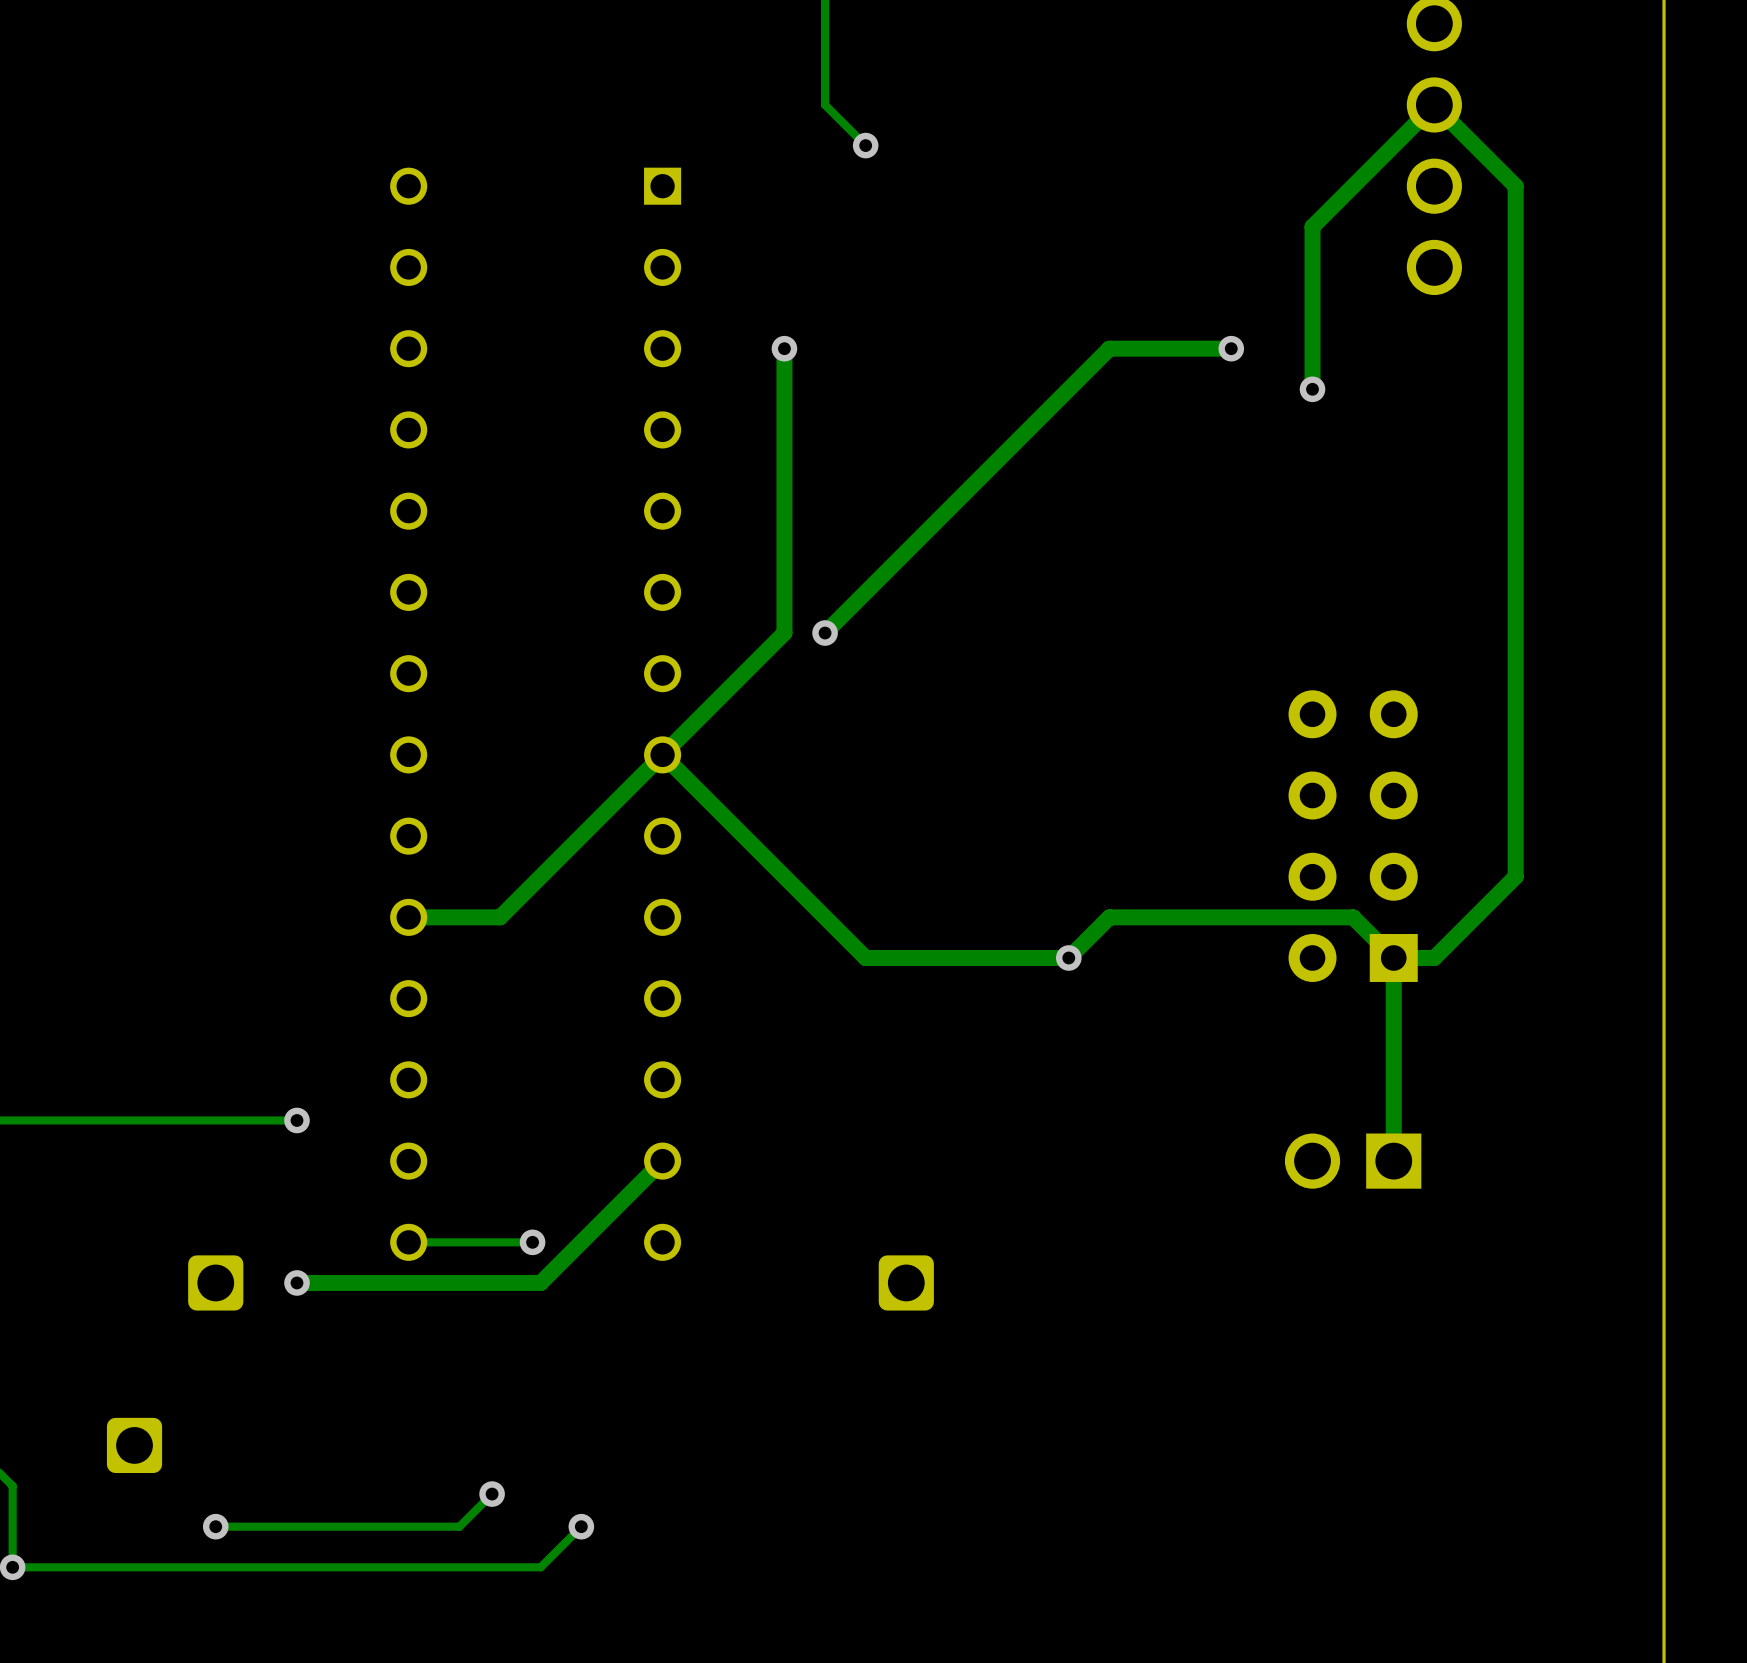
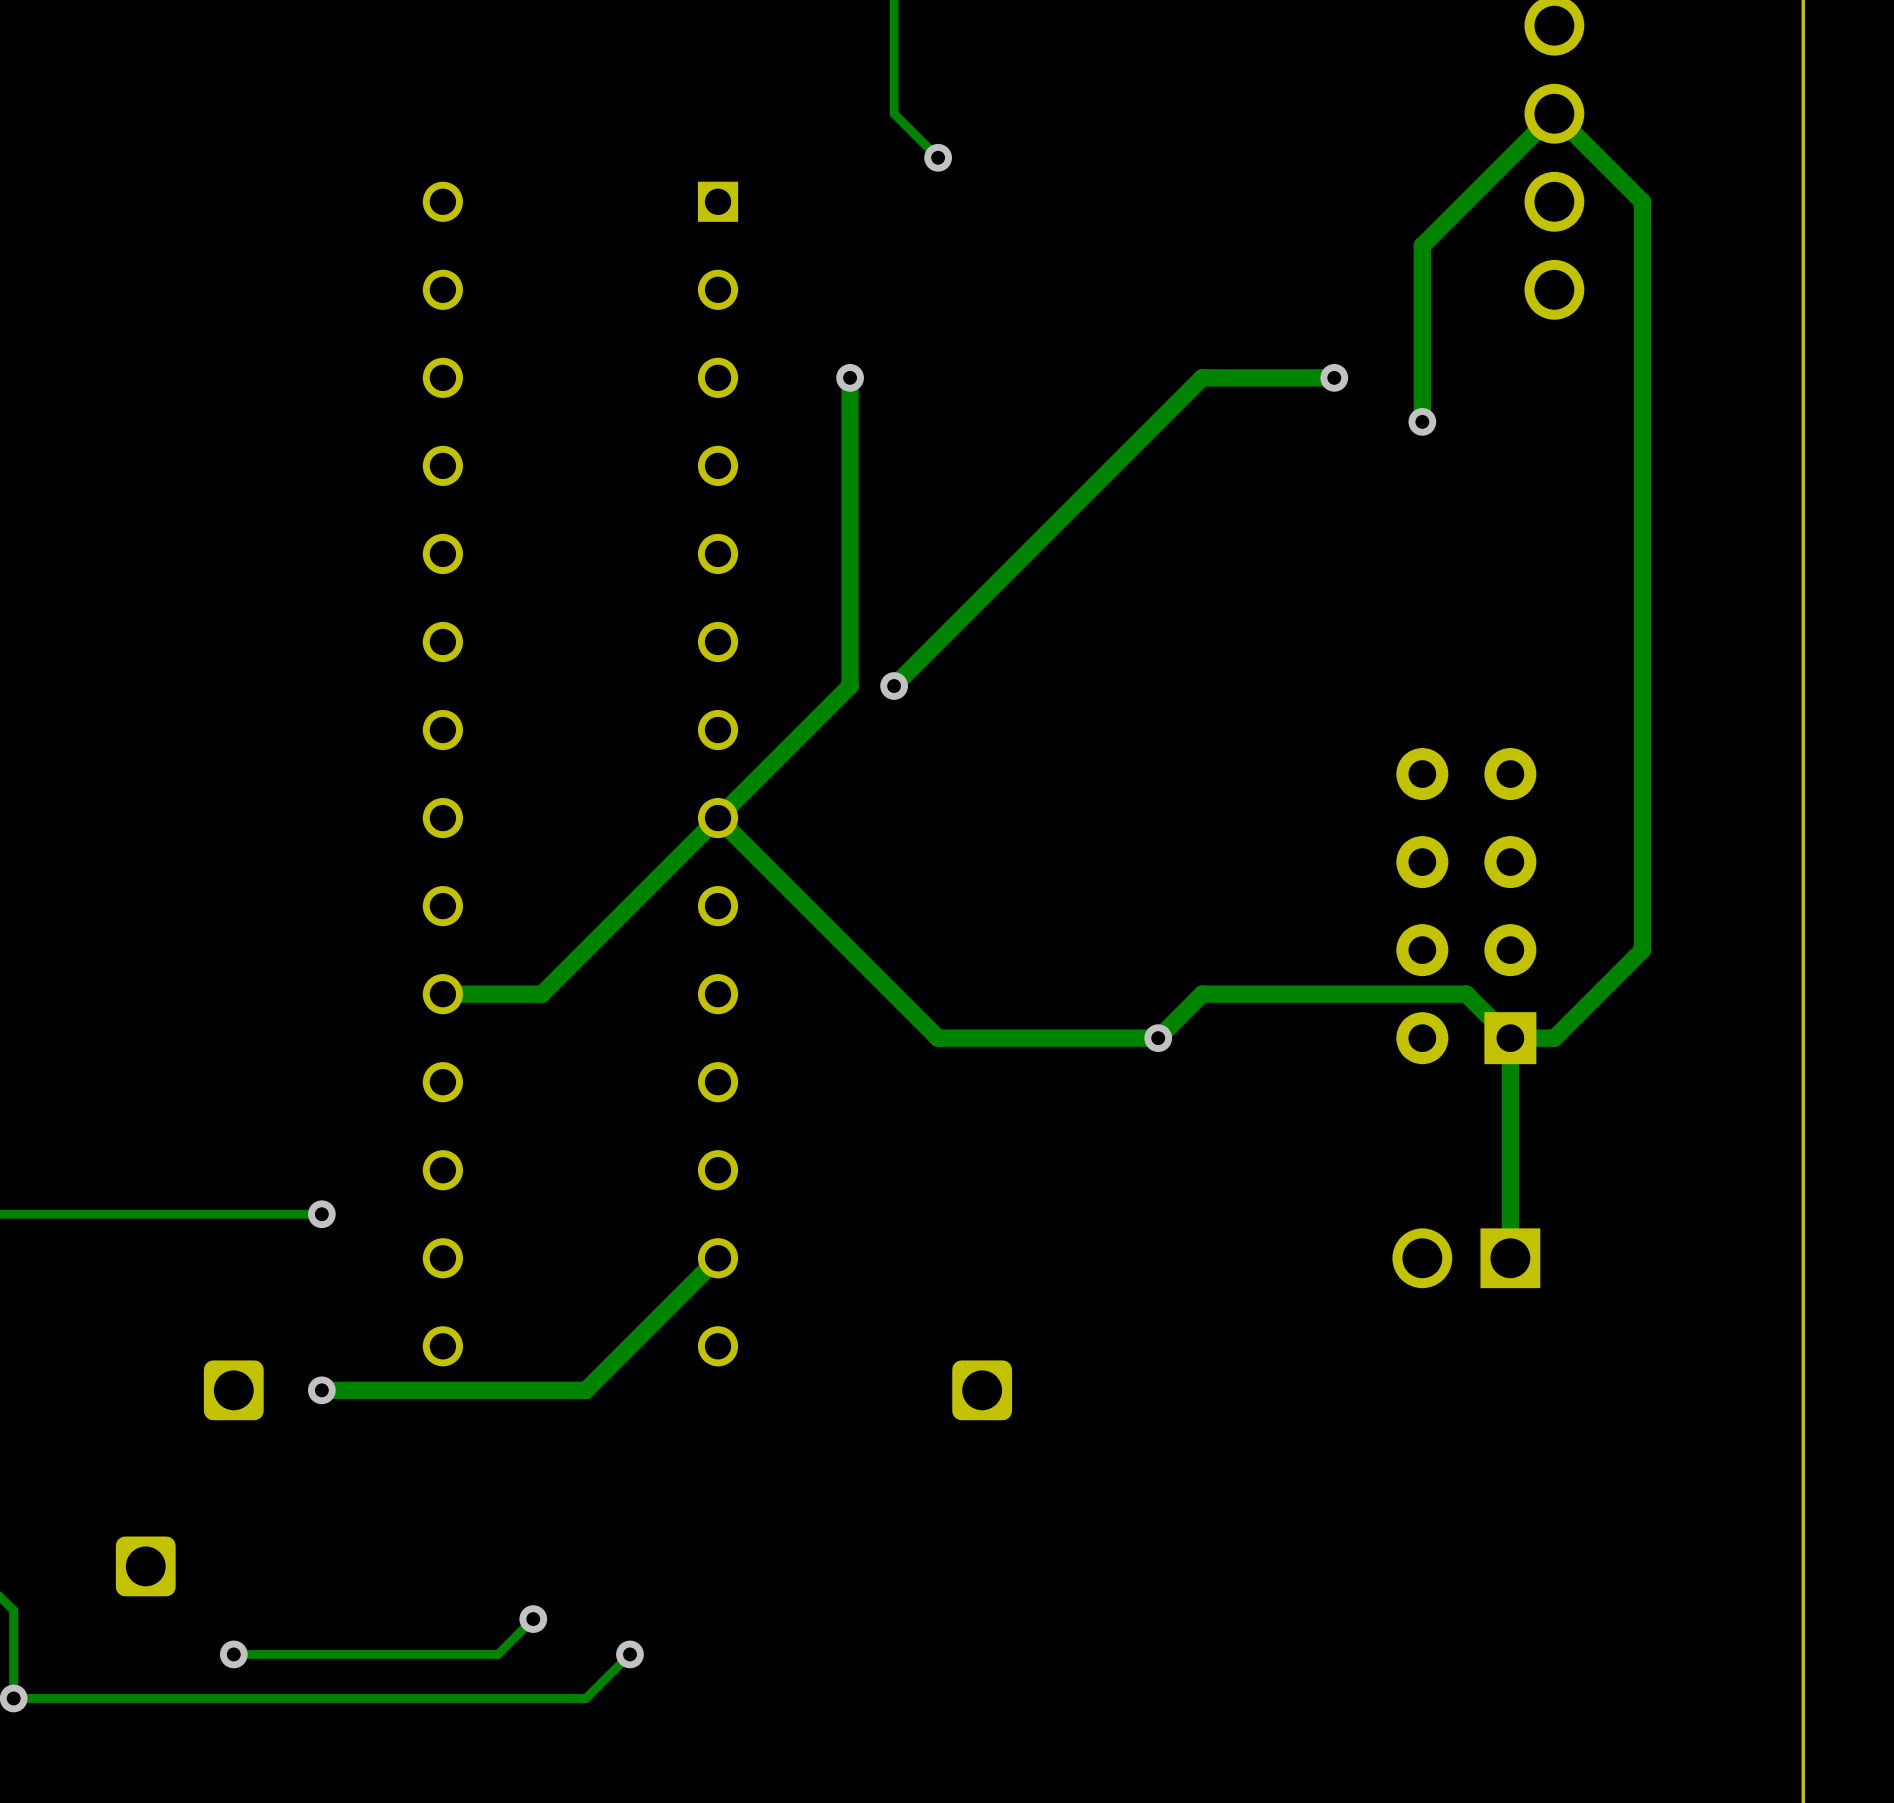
track: (532, 1242) (408, 1242) -> none
via: (532, 1242) -> none

